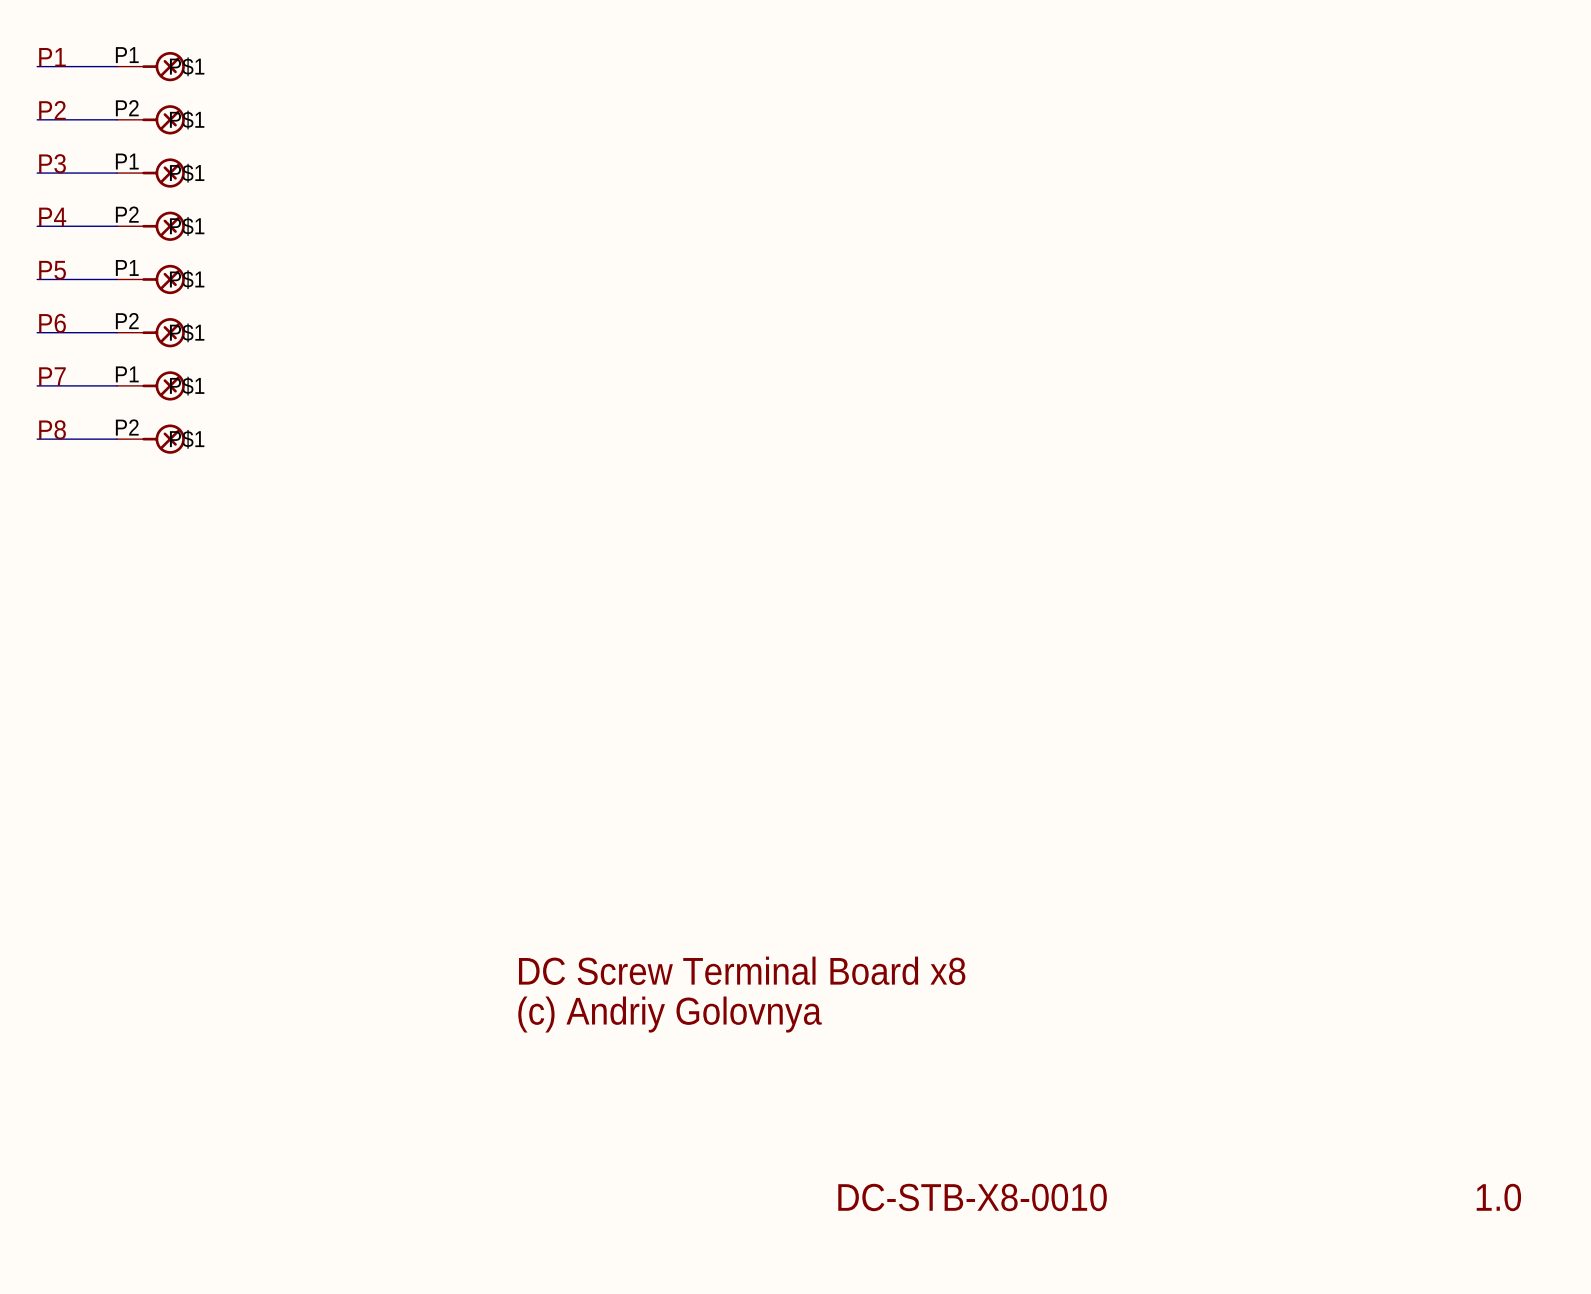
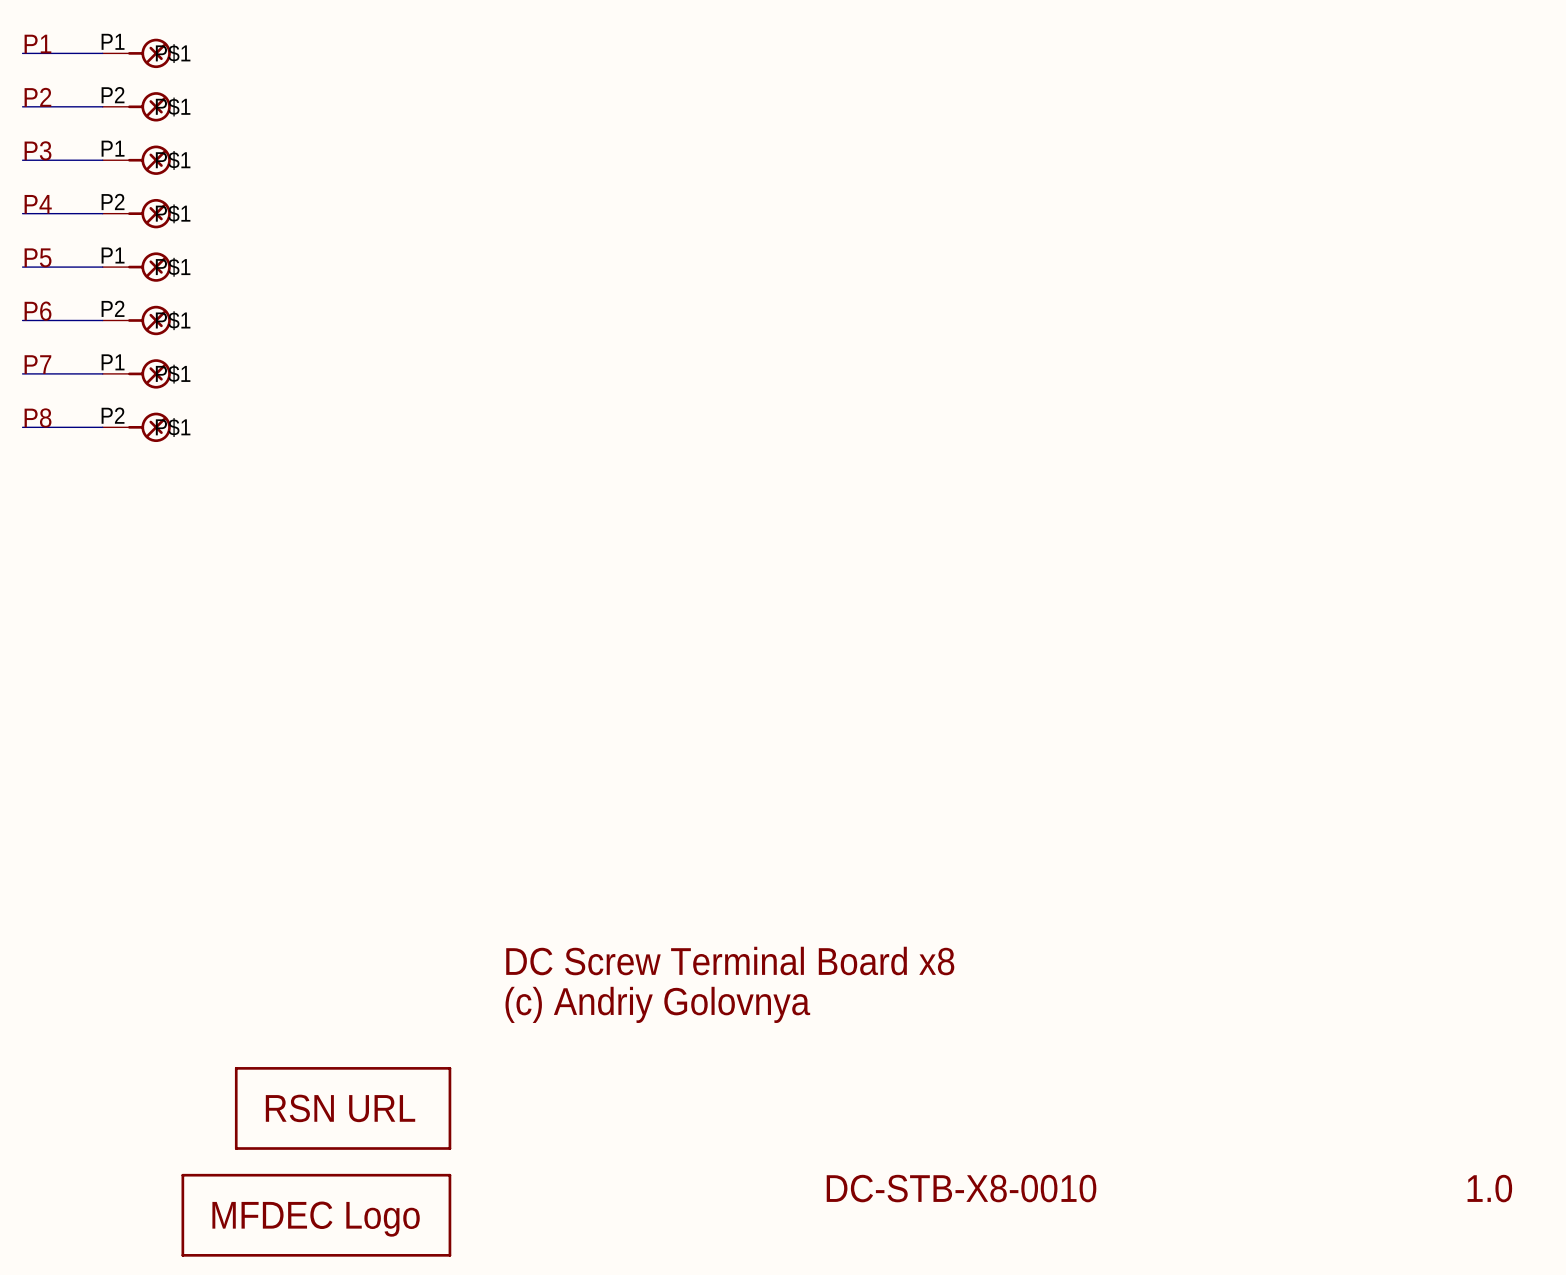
part: none -> (343, 1108)
part: none -> (316, 1215)

